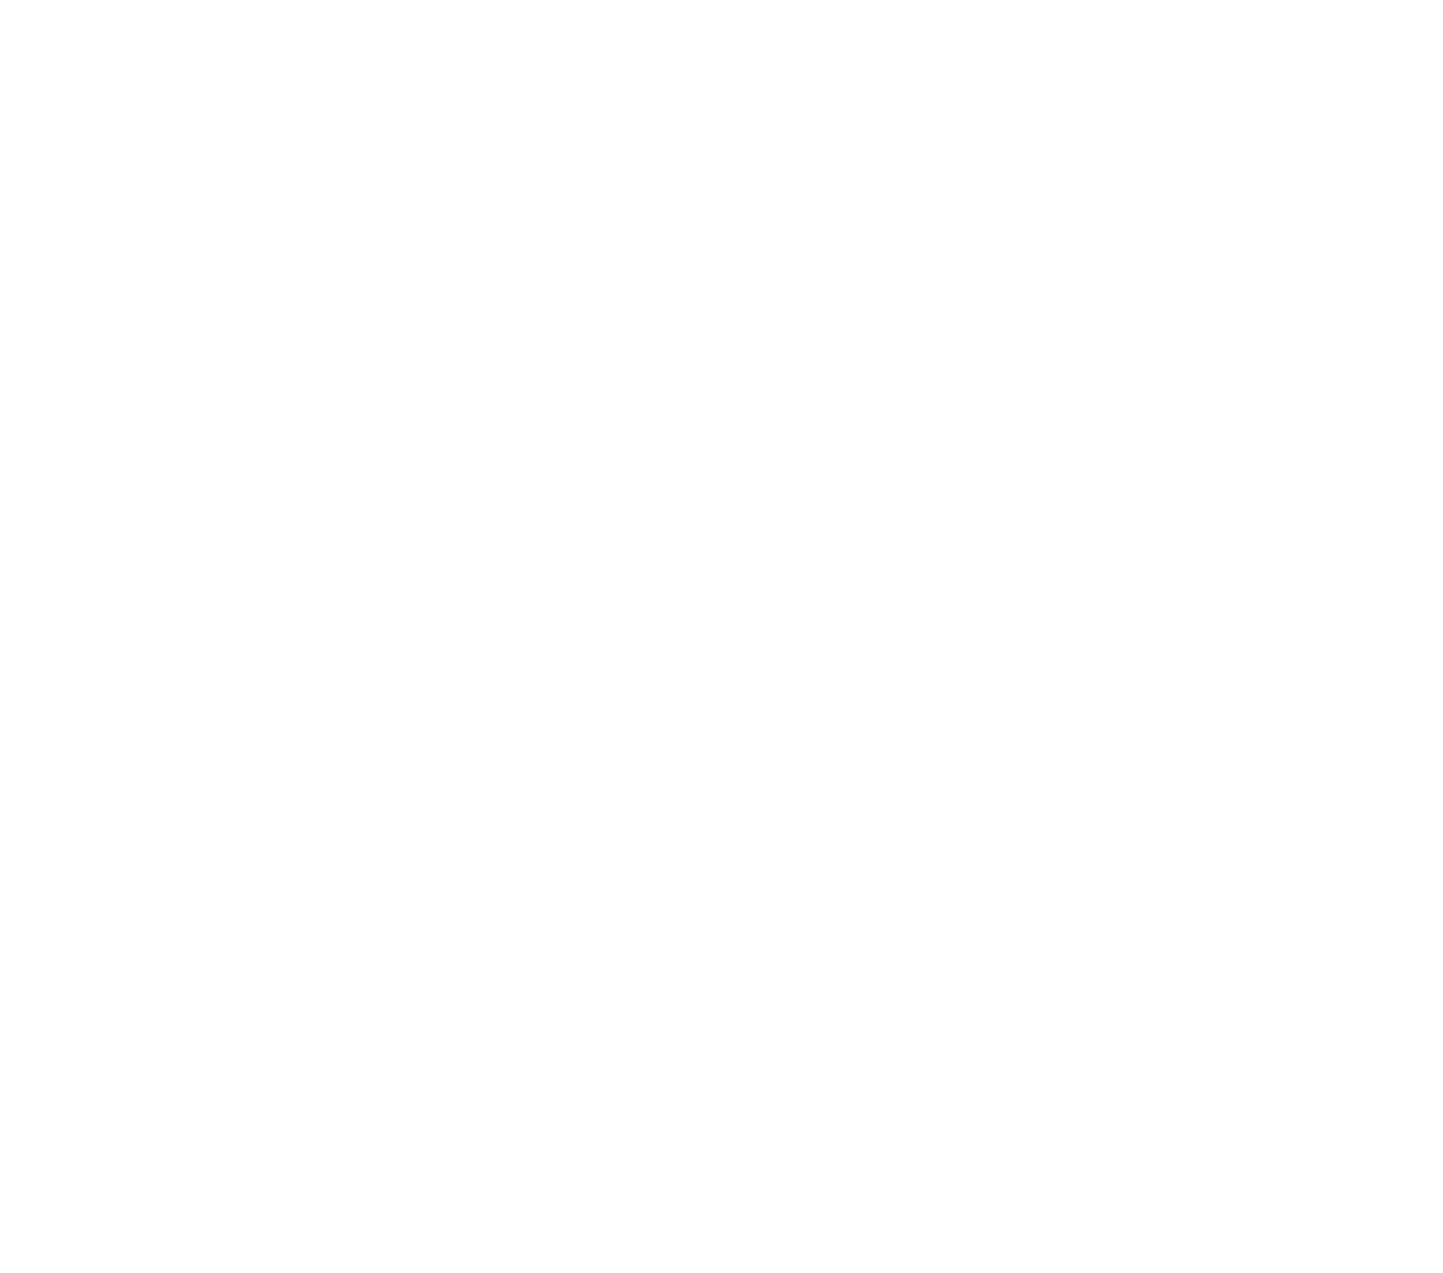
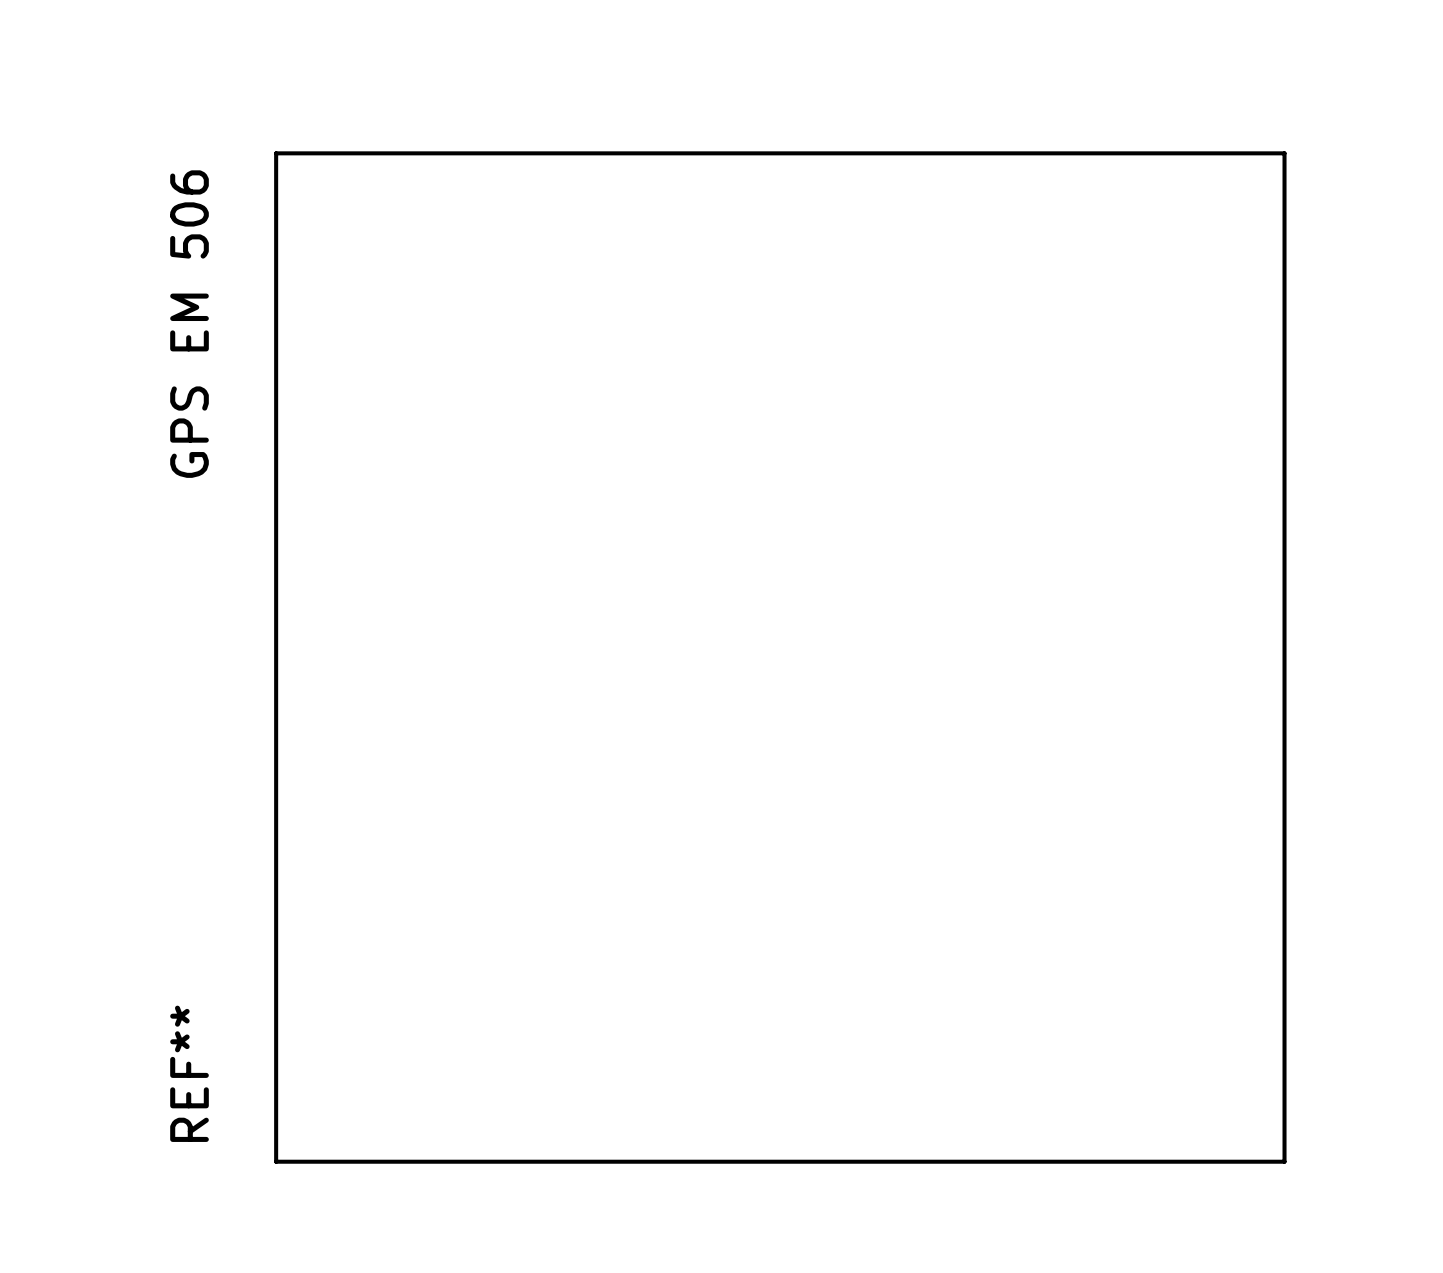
REF**: none -> (780, 657)

